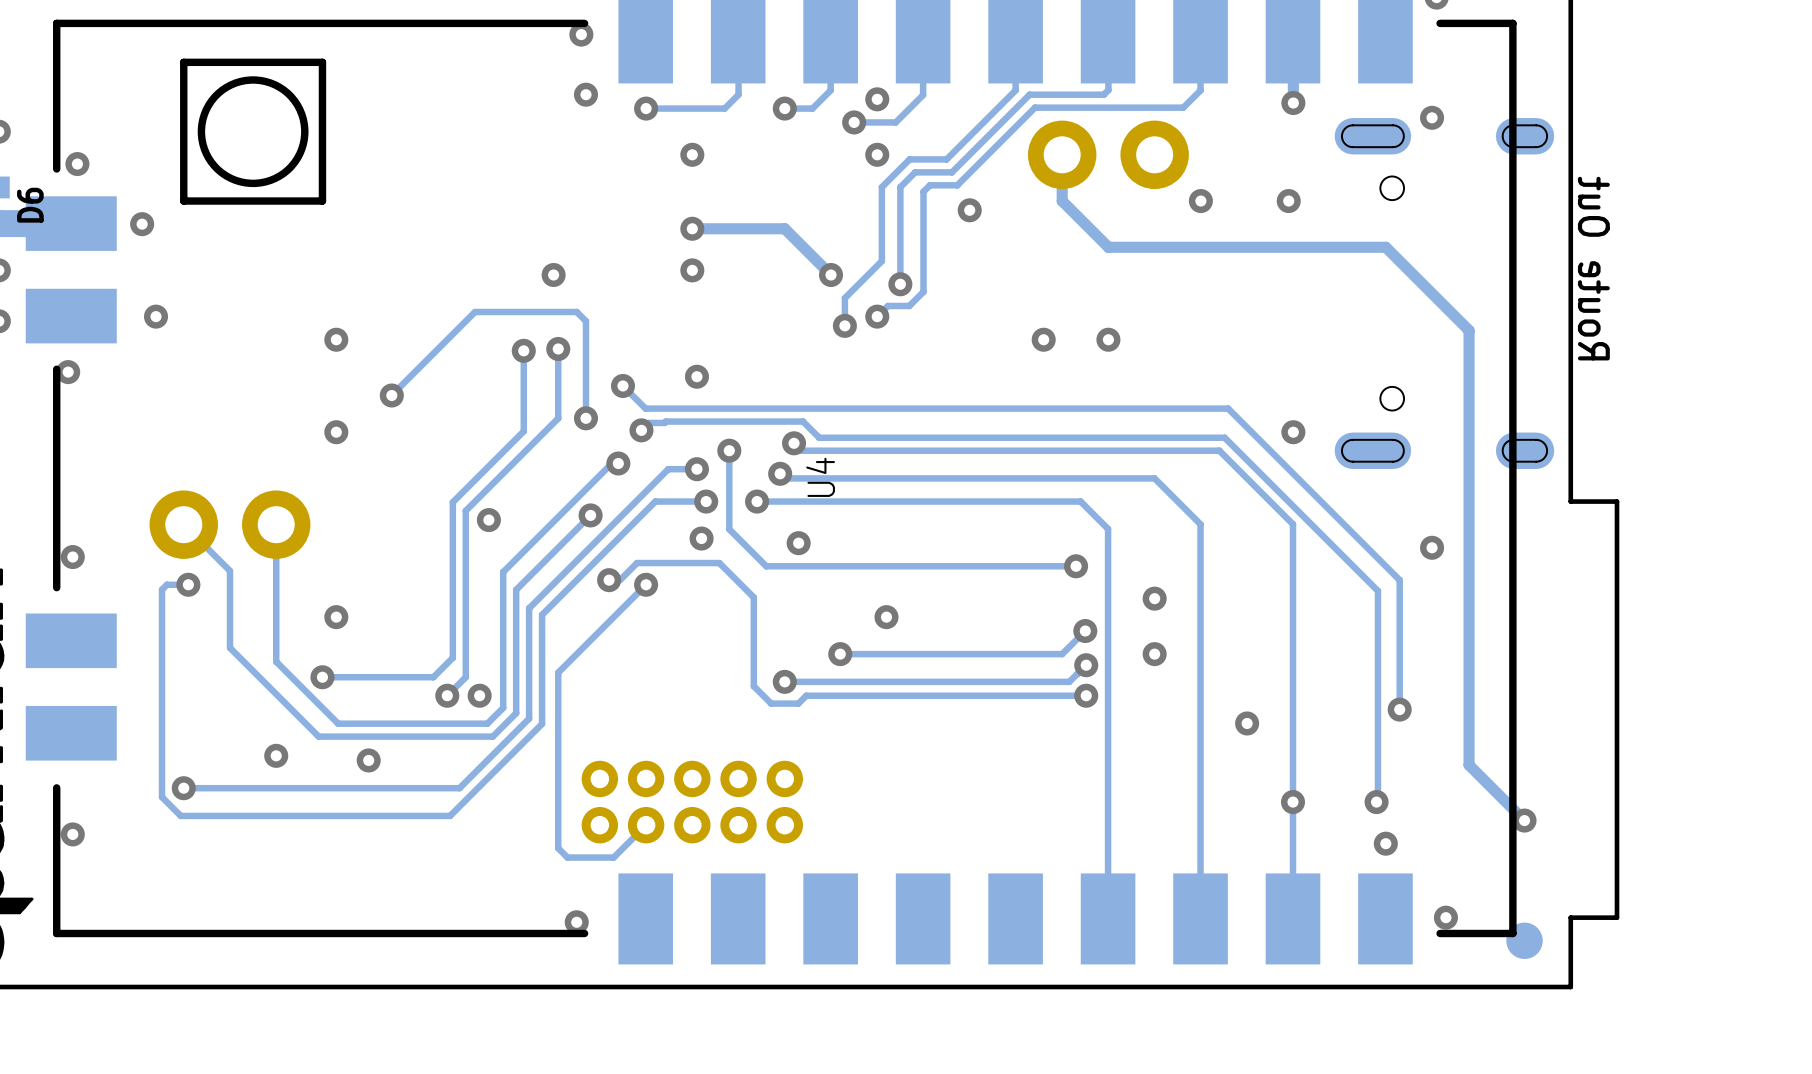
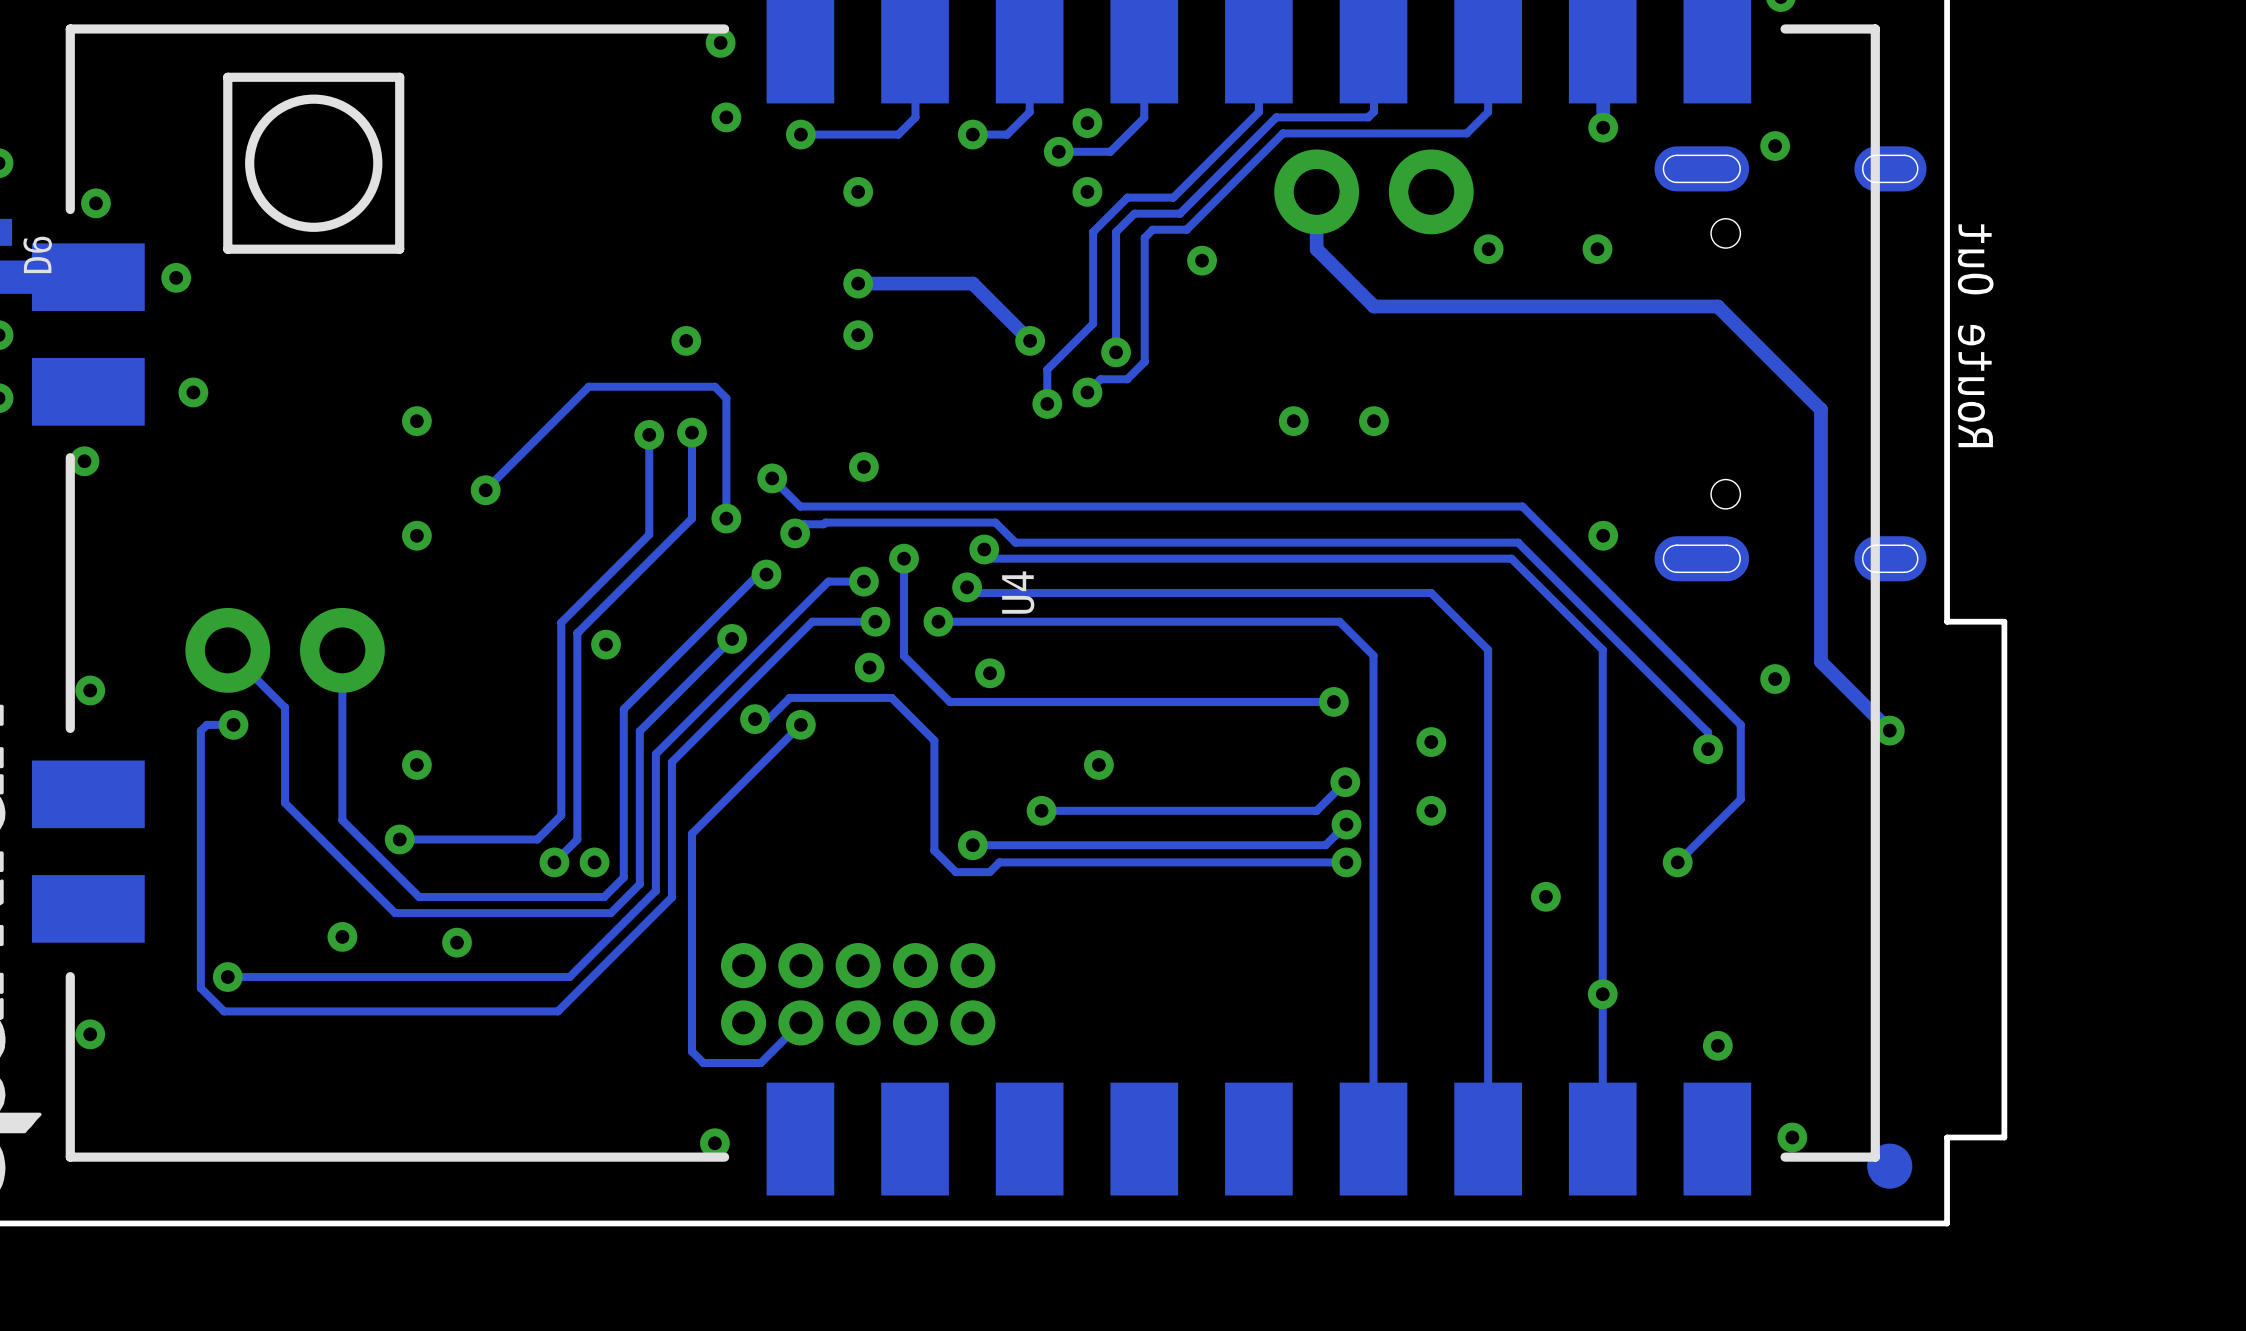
track: (1469, 533) (1469, 765) (1524, 820) -> (1820, 661) (1889, 730)
track: (1399, 580) (1399, 709) -> (1735, 719) (1740, 724) (1740, 799) (1677, 862)
via: none -> (1889, 730)
track: (1377, 604) (1376, 802) -> none
via: none -> (1708, 749)
via position: (1399, 709) -> (1677, 862)
via: (1376, 802) -> none
via: (1524, 820) -> none

